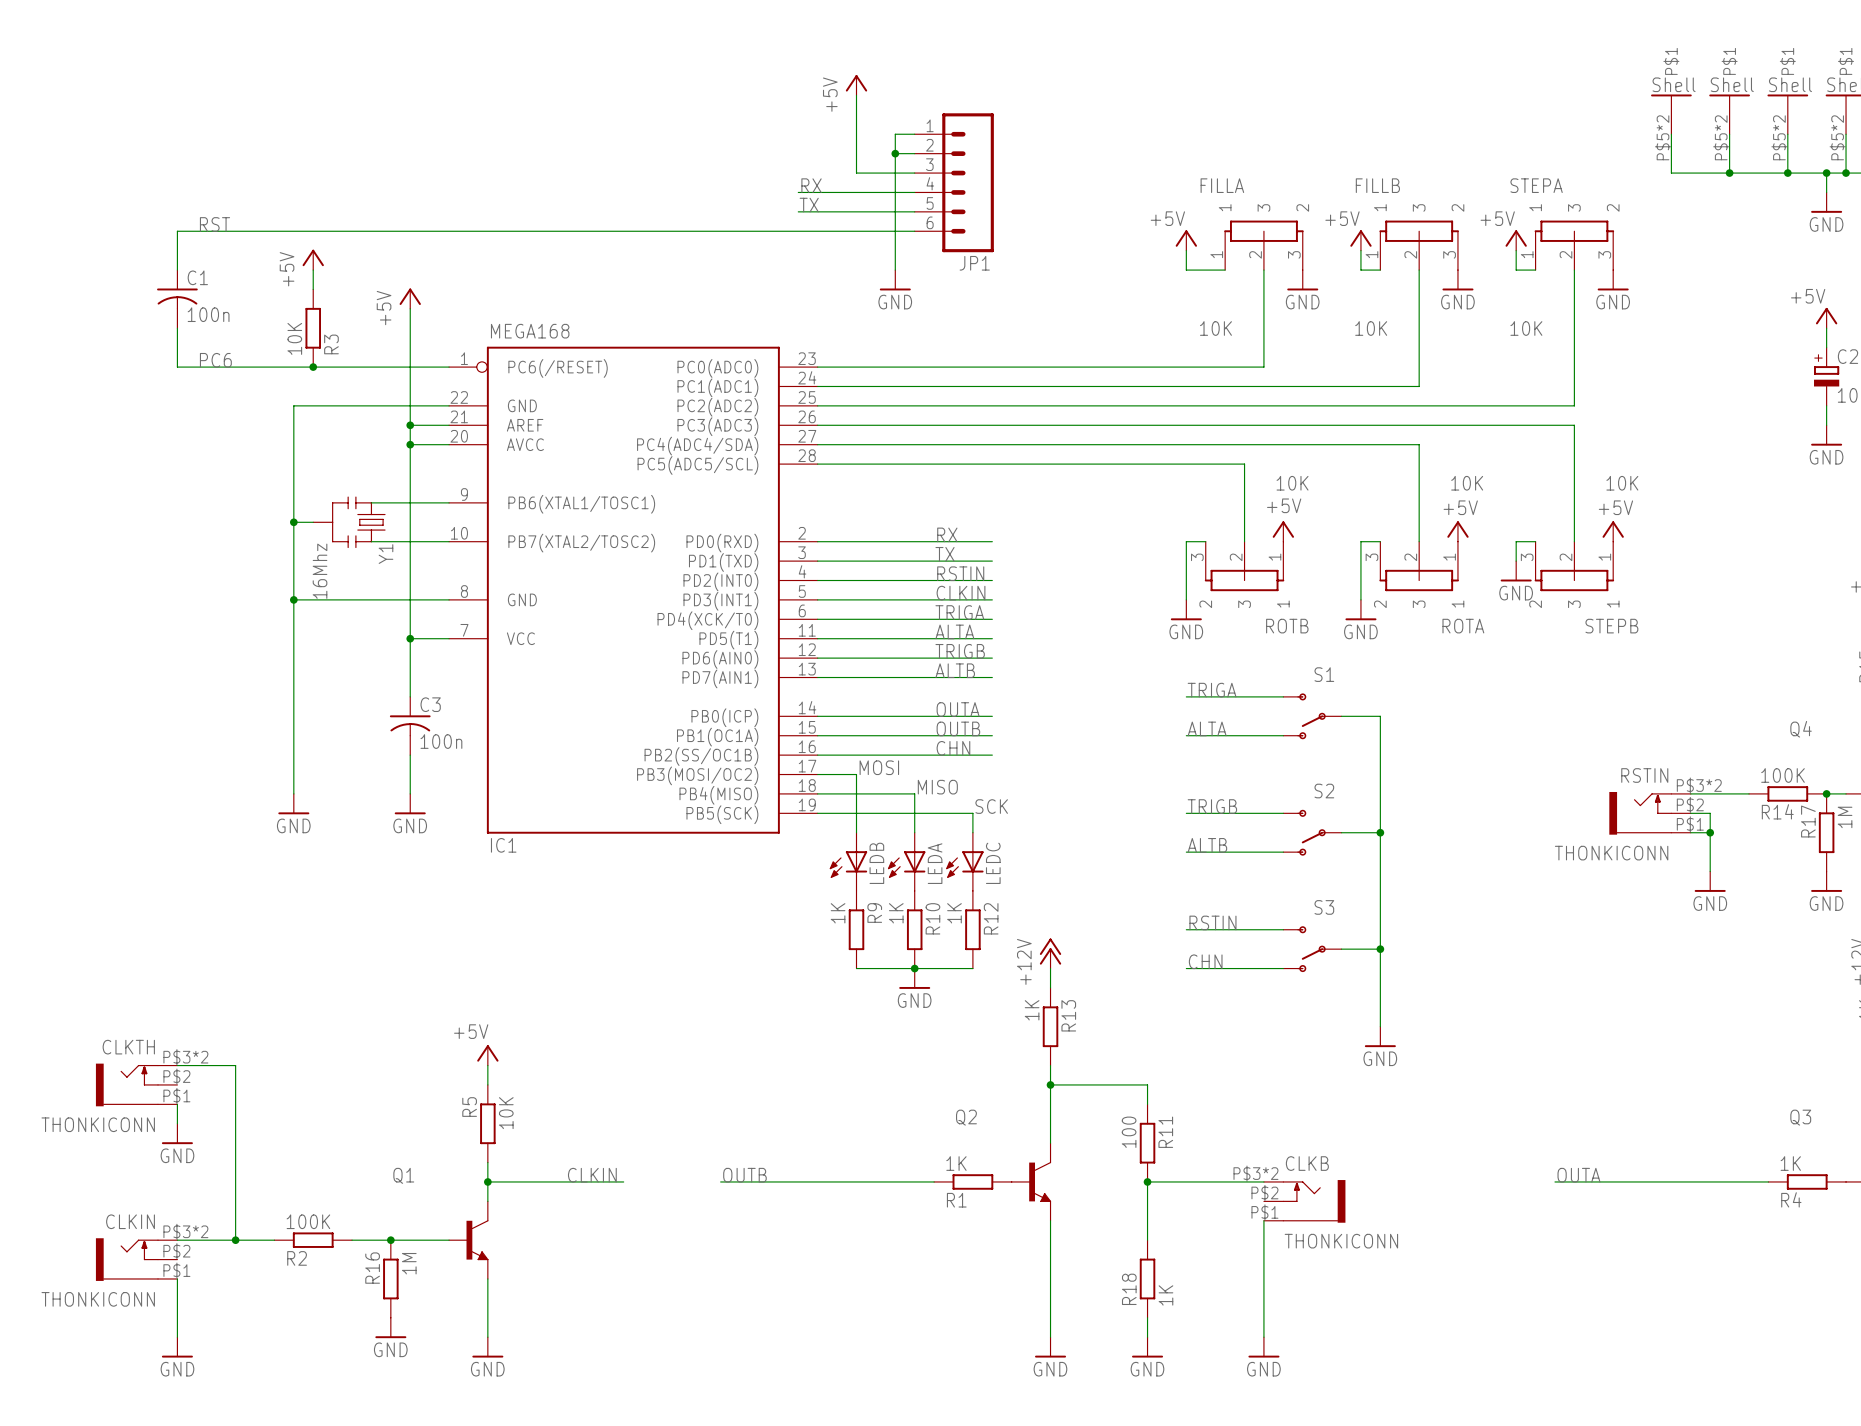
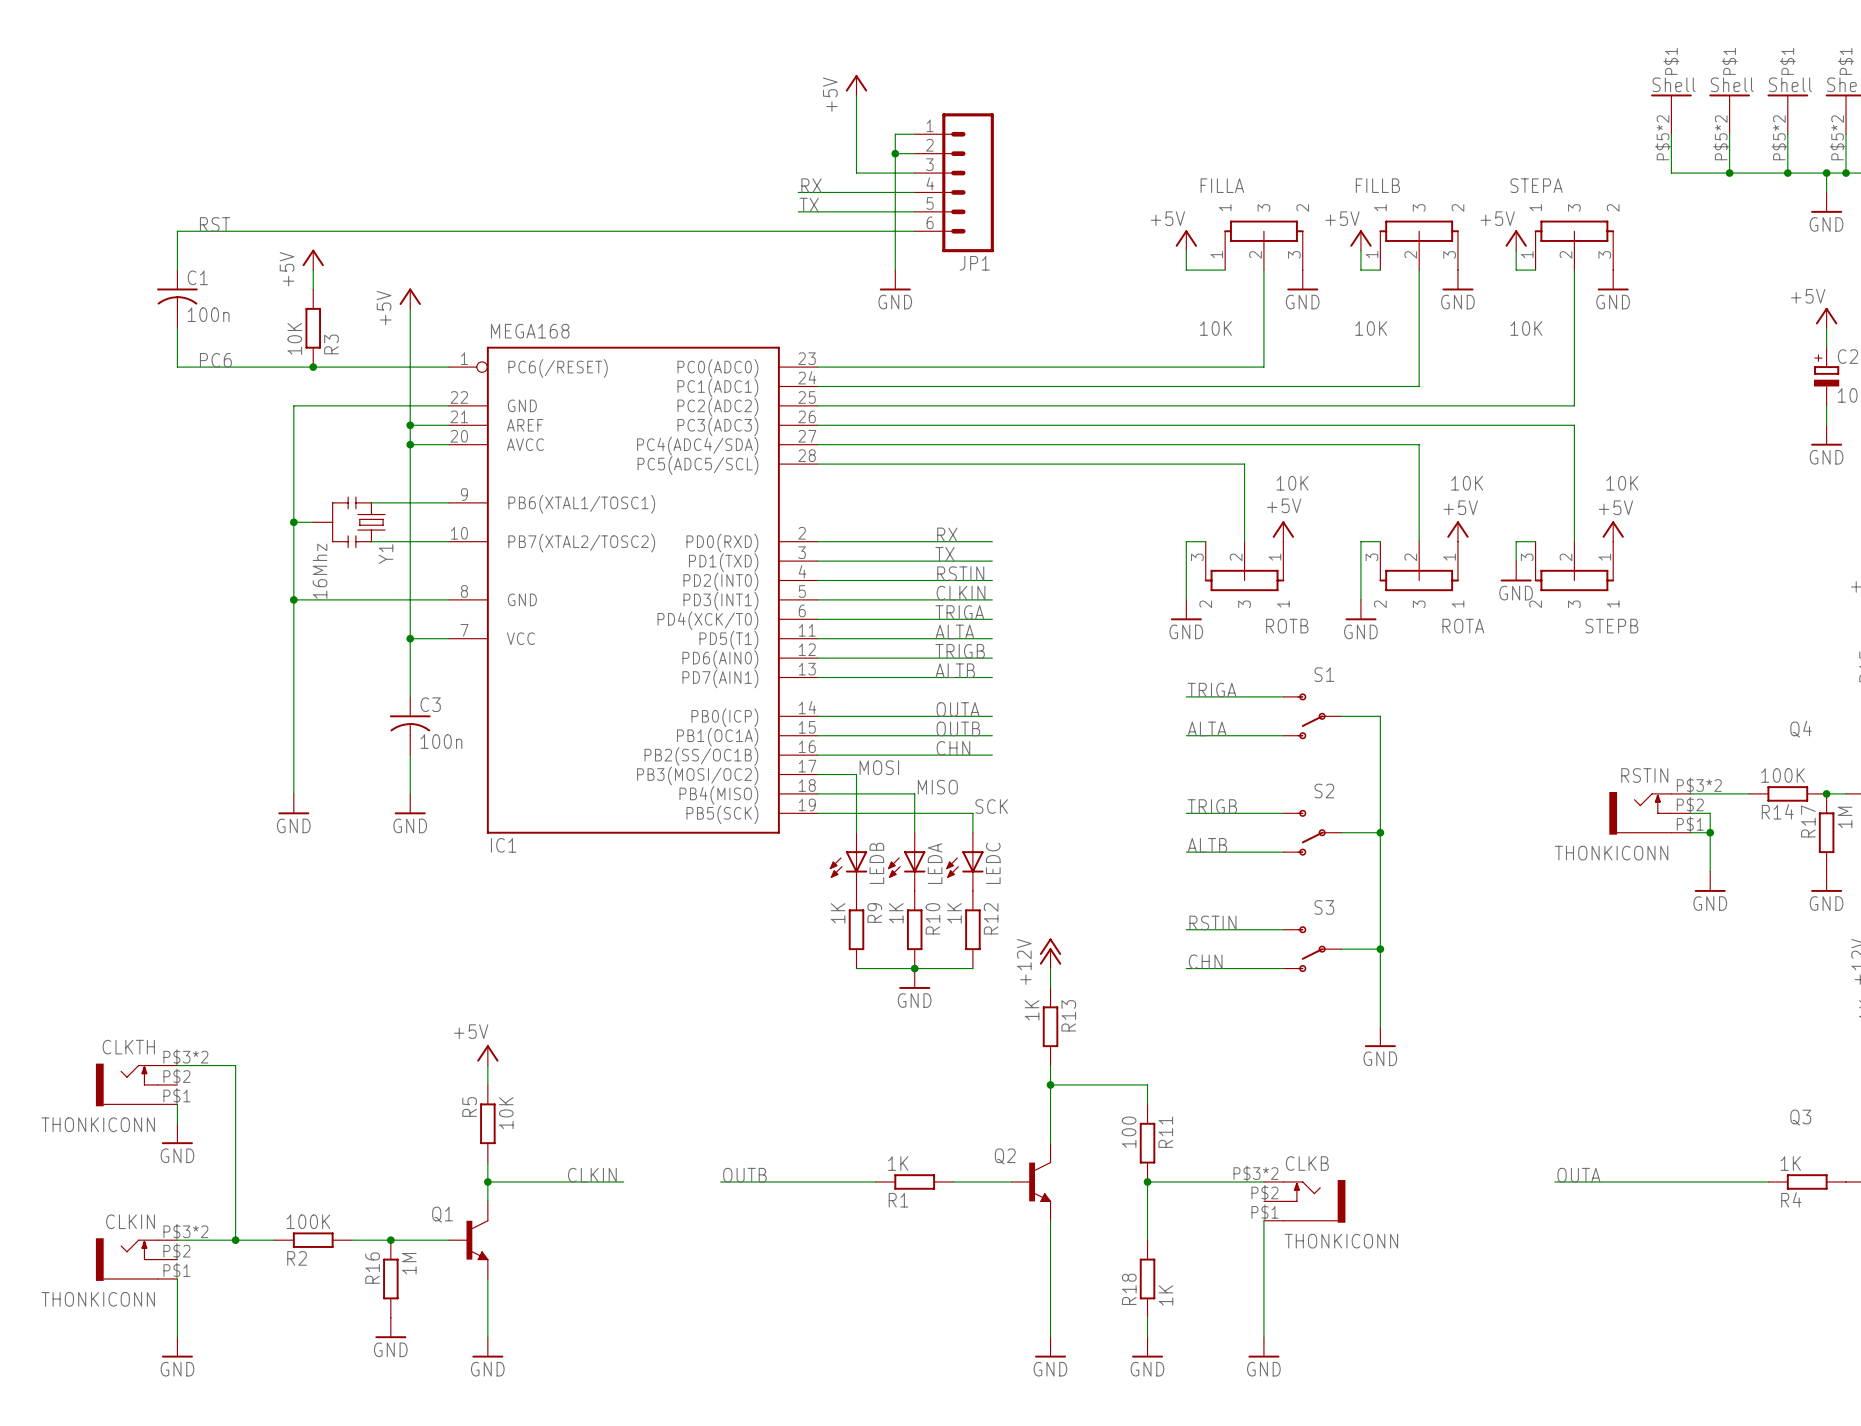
Q2 name position: Q2 (966, 1117) -> Q2 (1005, 1156)
Q1 name position: Q1 (403, 1175) -> Q1 (442, 1214)
wire: (875, 1181) (934, 1181) -> (953, 1181) (1011, 1181)
R1 position: (972, 1181) -> (914, 1181)

